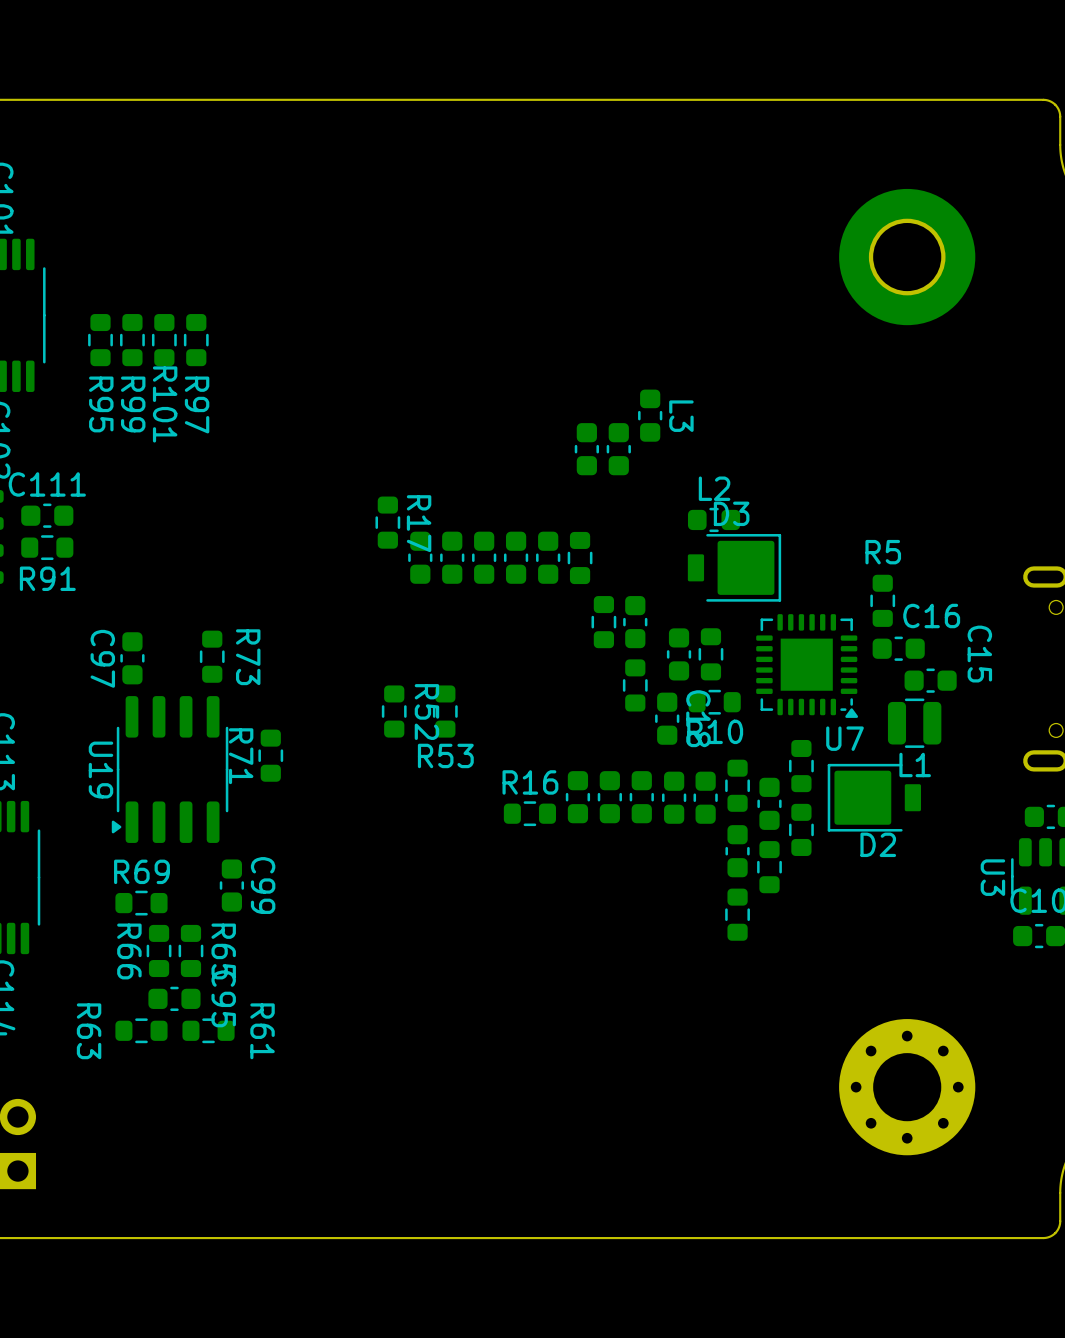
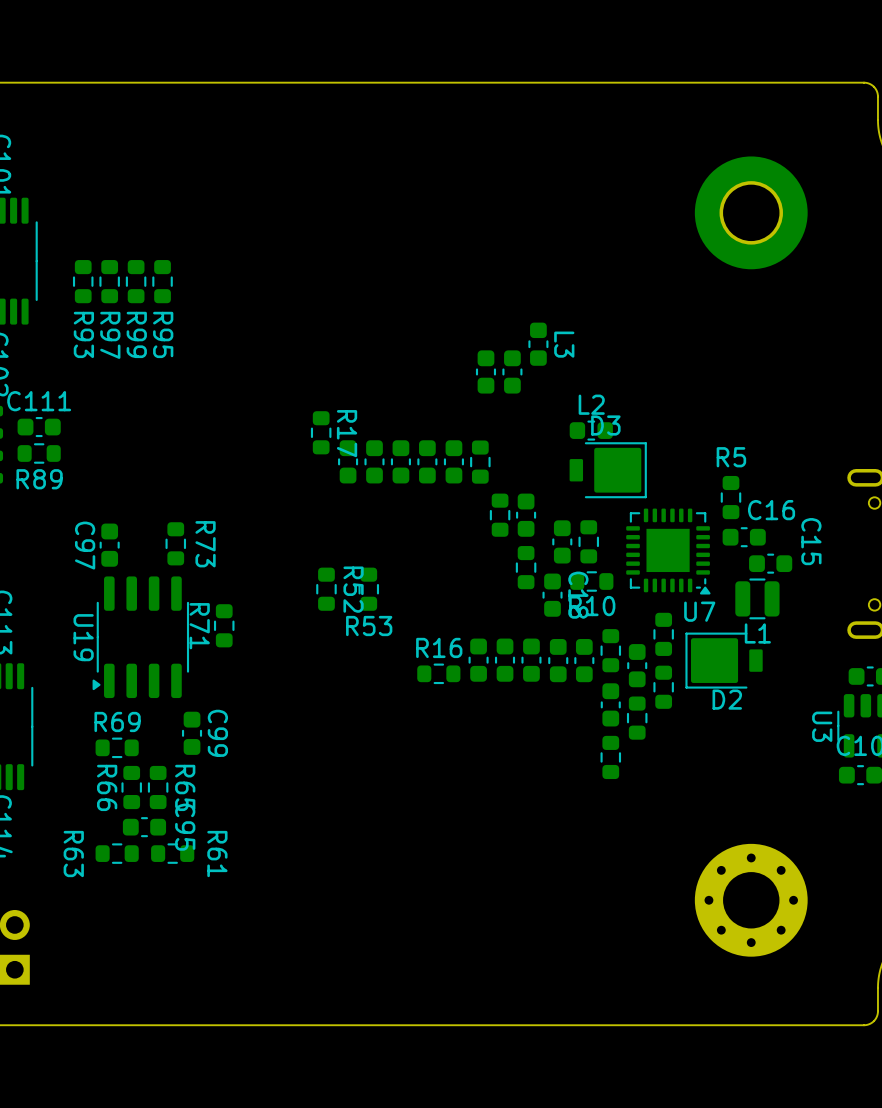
R95 name: R95 (101, 404) -> R93 (83, 334)
R99 name: R99 (133, 404) -> R97 (110, 335)
R101 name: R101 (165, 404) -> R99 (136, 334)
R97 name: R97 (197, 404) -> R95 (163, 334)
R91 name: R91 (47, 578) -> R89 (39, 479)

